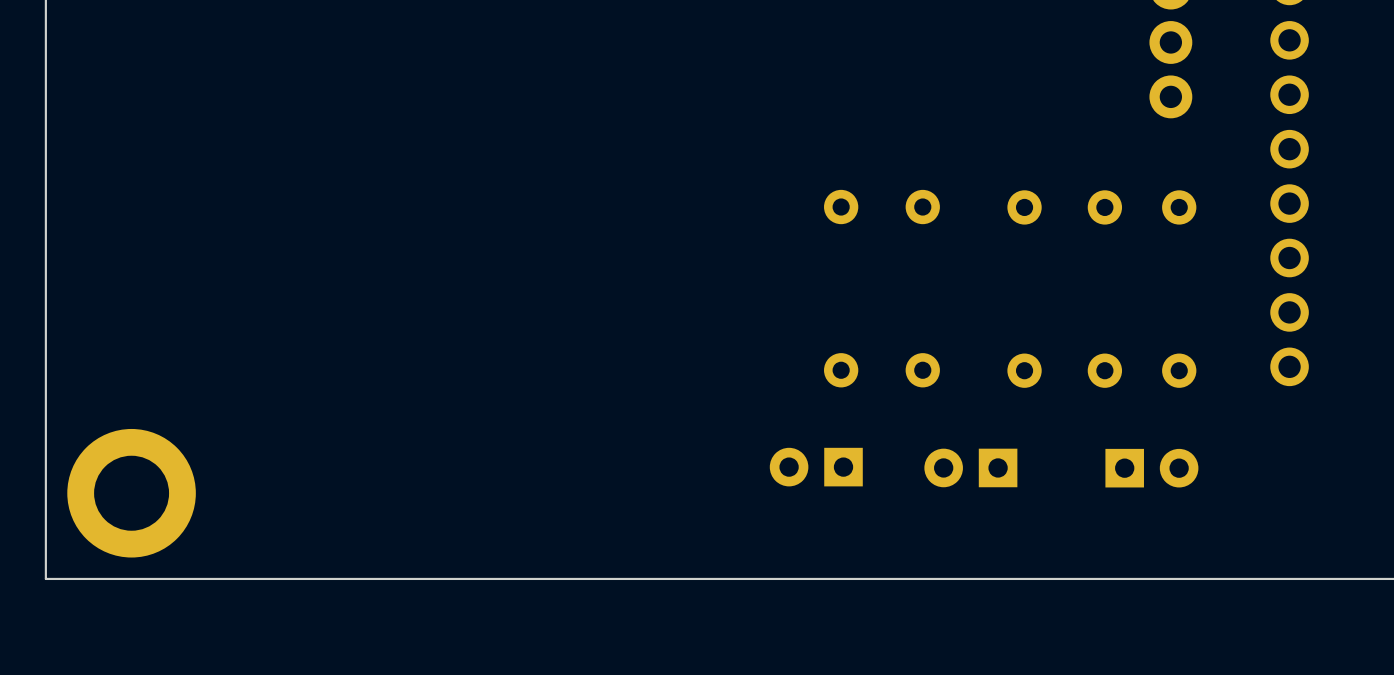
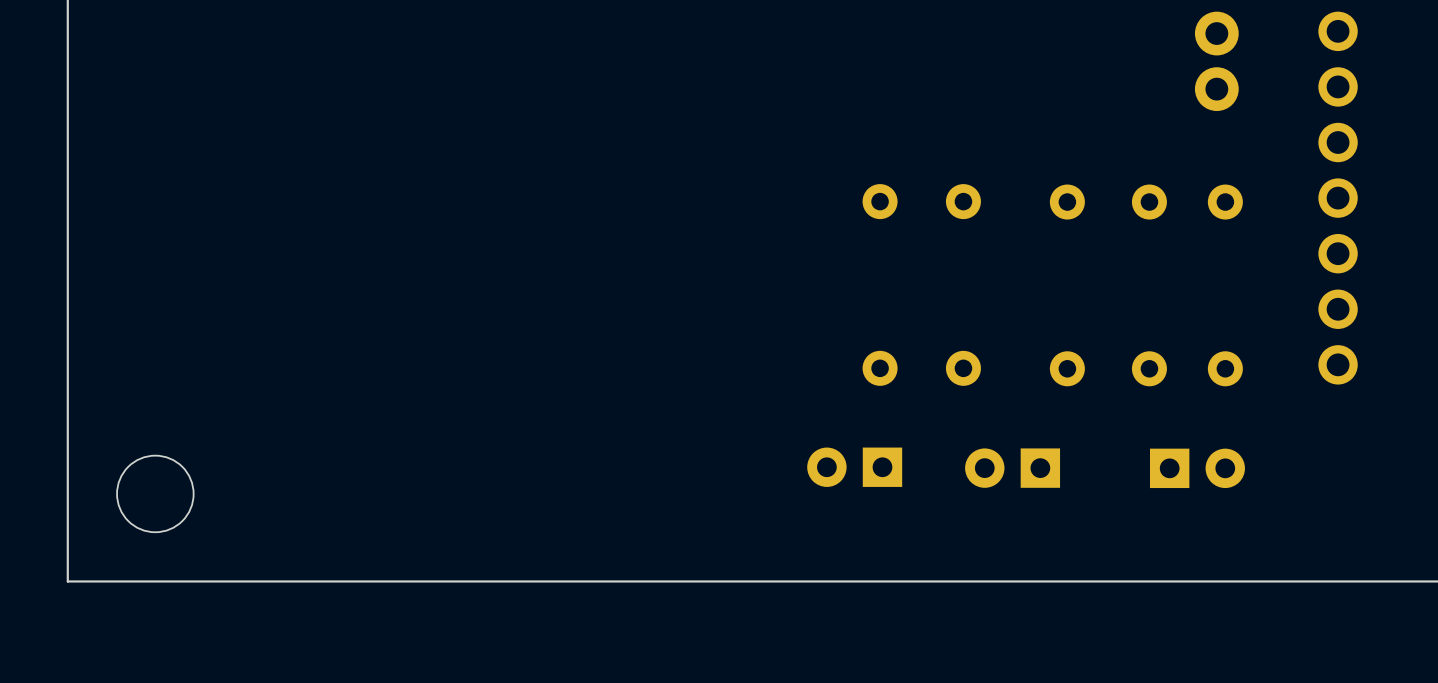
round board edge: none -> [116, 455, 195, 533]
part: (131, 493) -> none

